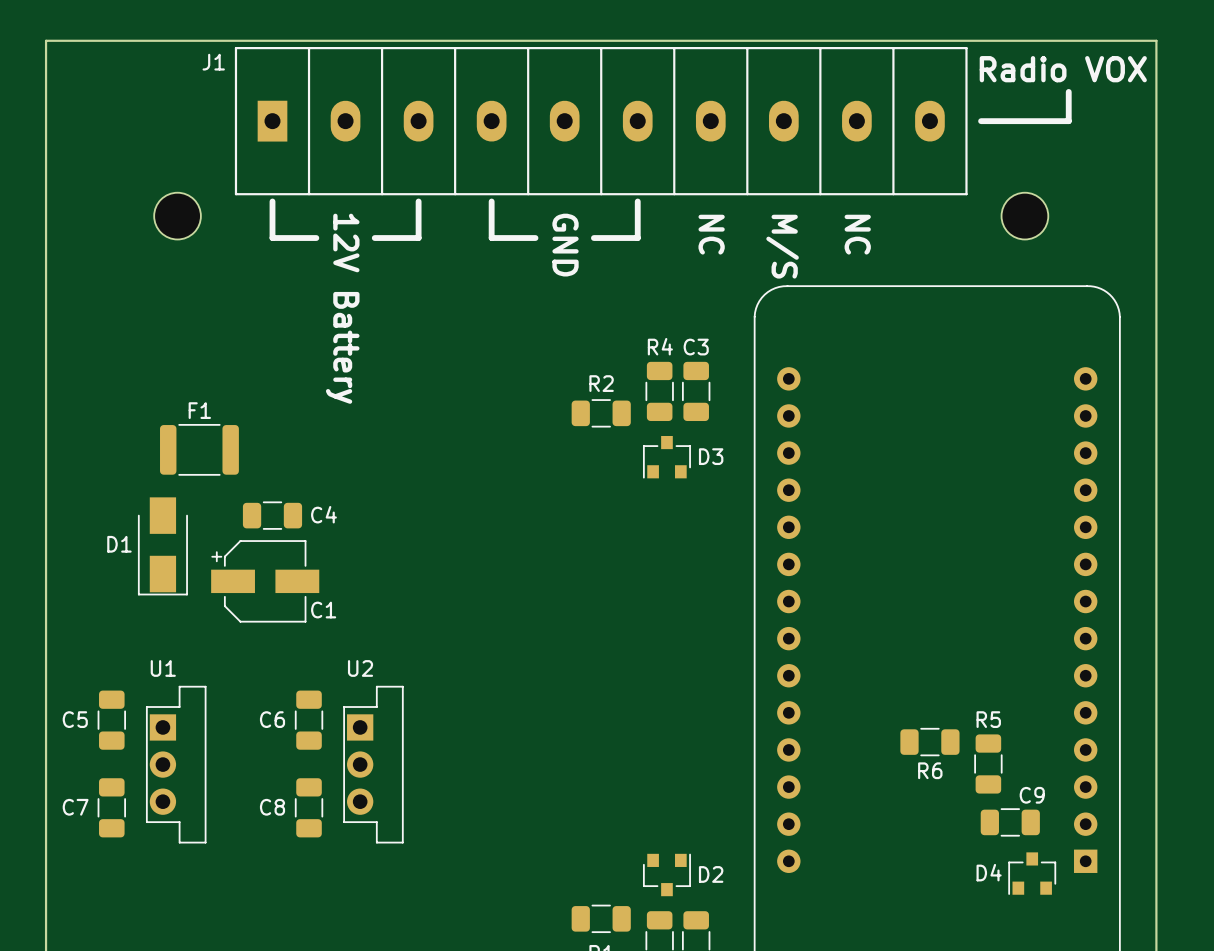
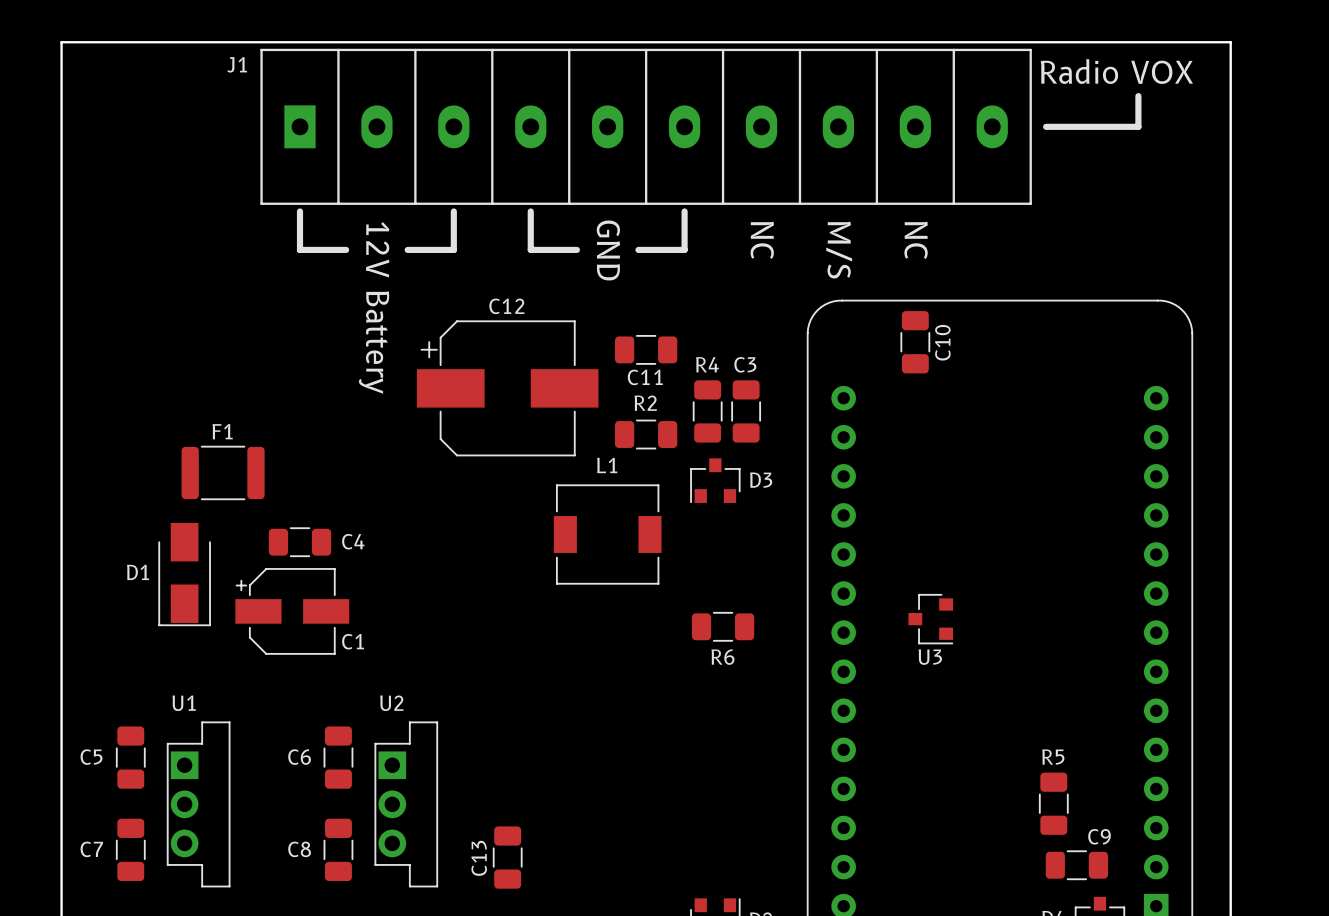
part: (177, 216) -> none
part: (1024, 216) -> none
C10: none -> (915, 342)
C11: none -> (646, 349)
C12: none -> (507, 388)
L1: none -> (607, 534)
U3: none -> (930, 619)
R6 position: (929, 742) -> (723, 626)
C13: none -> (507, 857)

